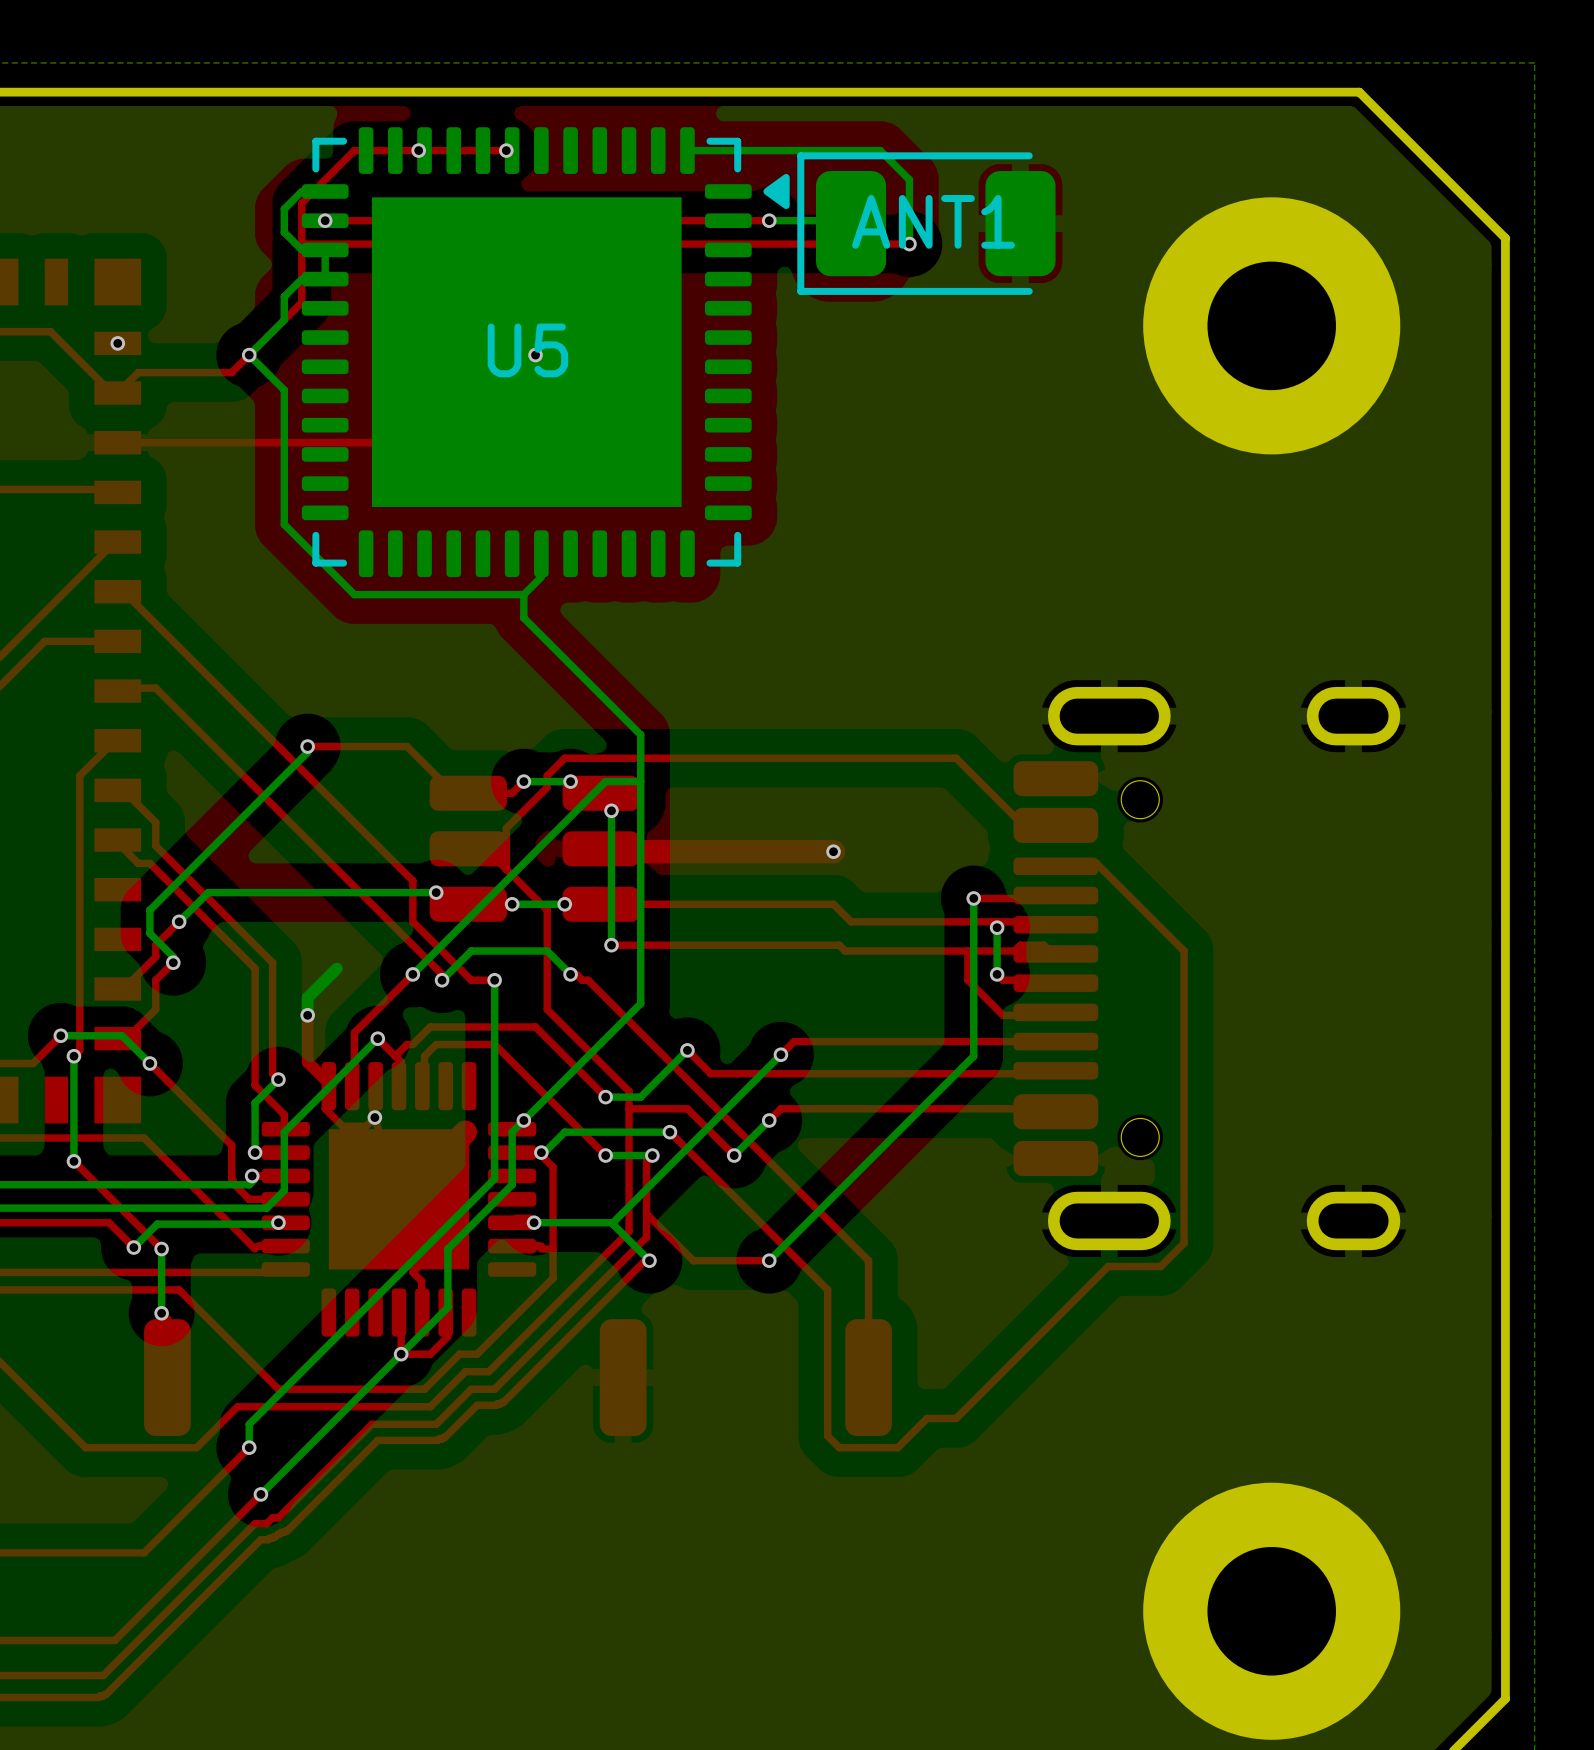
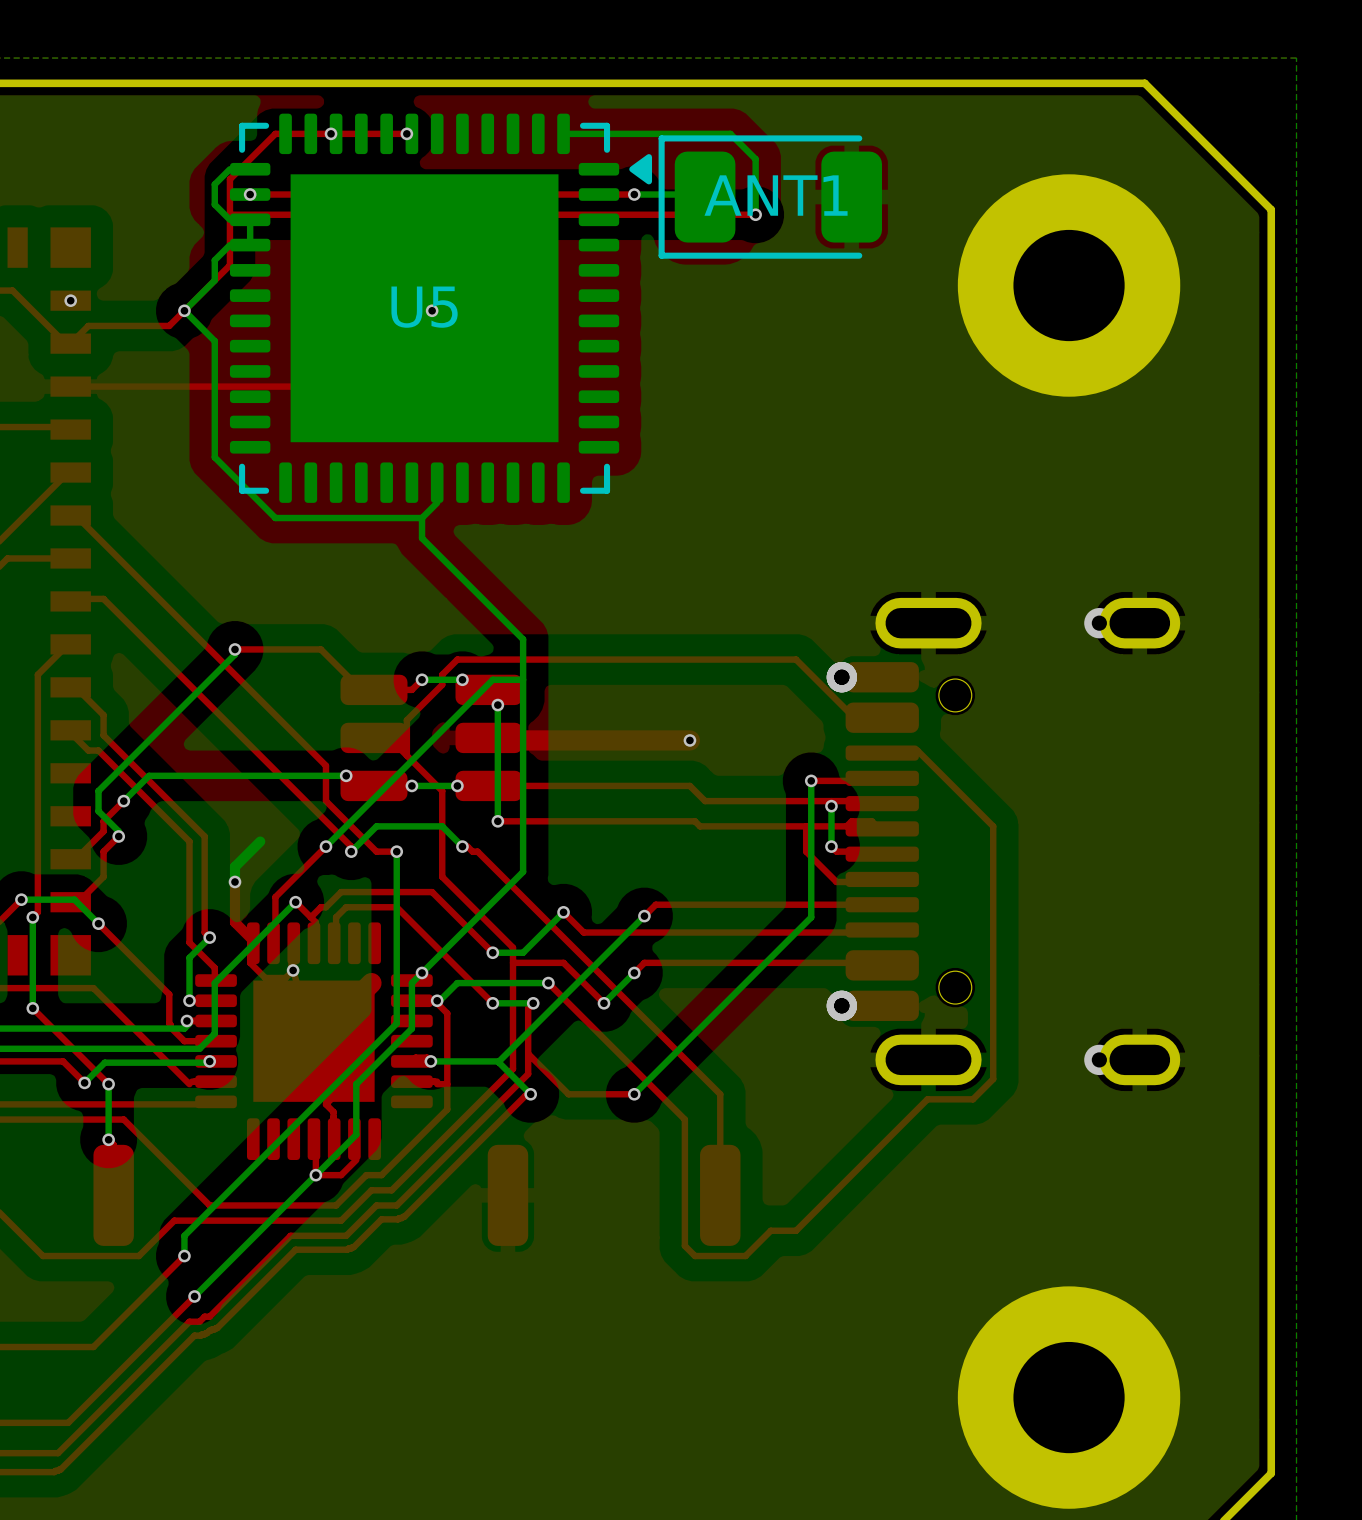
via: none -> (1099, 623)
via: none -> (841, 677)
via: none -> (841, 1005)
via: none -> (1099, 1059)

